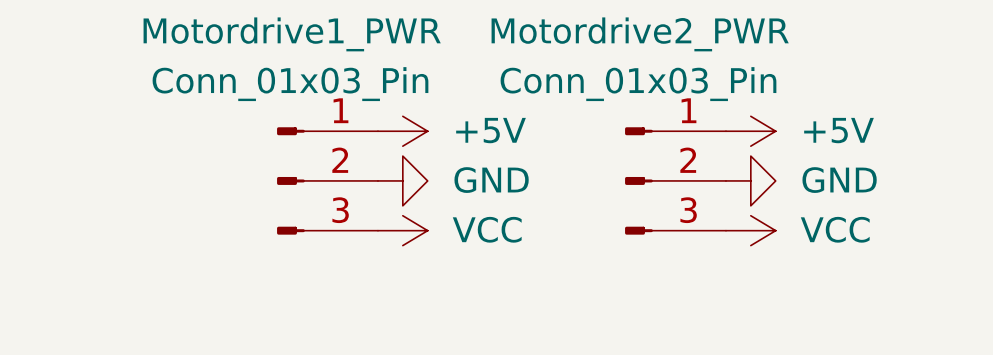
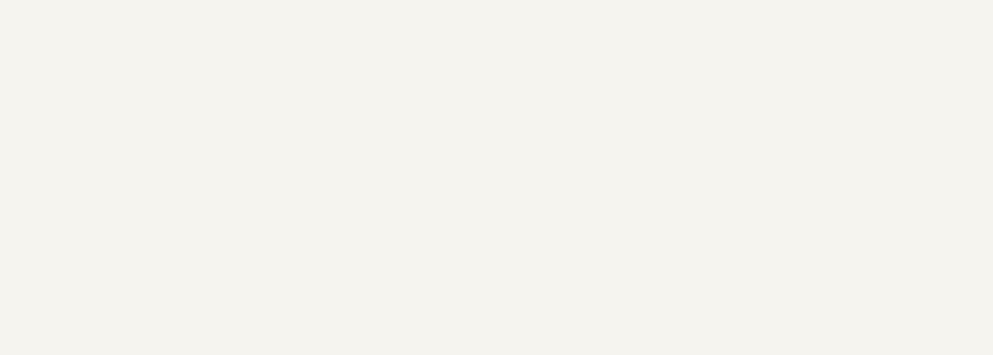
power symbol: +5V (402, 131) -> none
power symbol: +5V (750, 131) -> none
Motordrive1_PWR: Conn_01x03_Pin (327, 180) -> none
power symbol: GND (402, 180) -> none
Motordrive2_PWR: Conn_01x03_Pin (675, 180) -> none
power symbol: GND (750, 180) -> none
power symbol: VCC (402, 230) -> none
power symbol: VCC (750, 230) -> none

